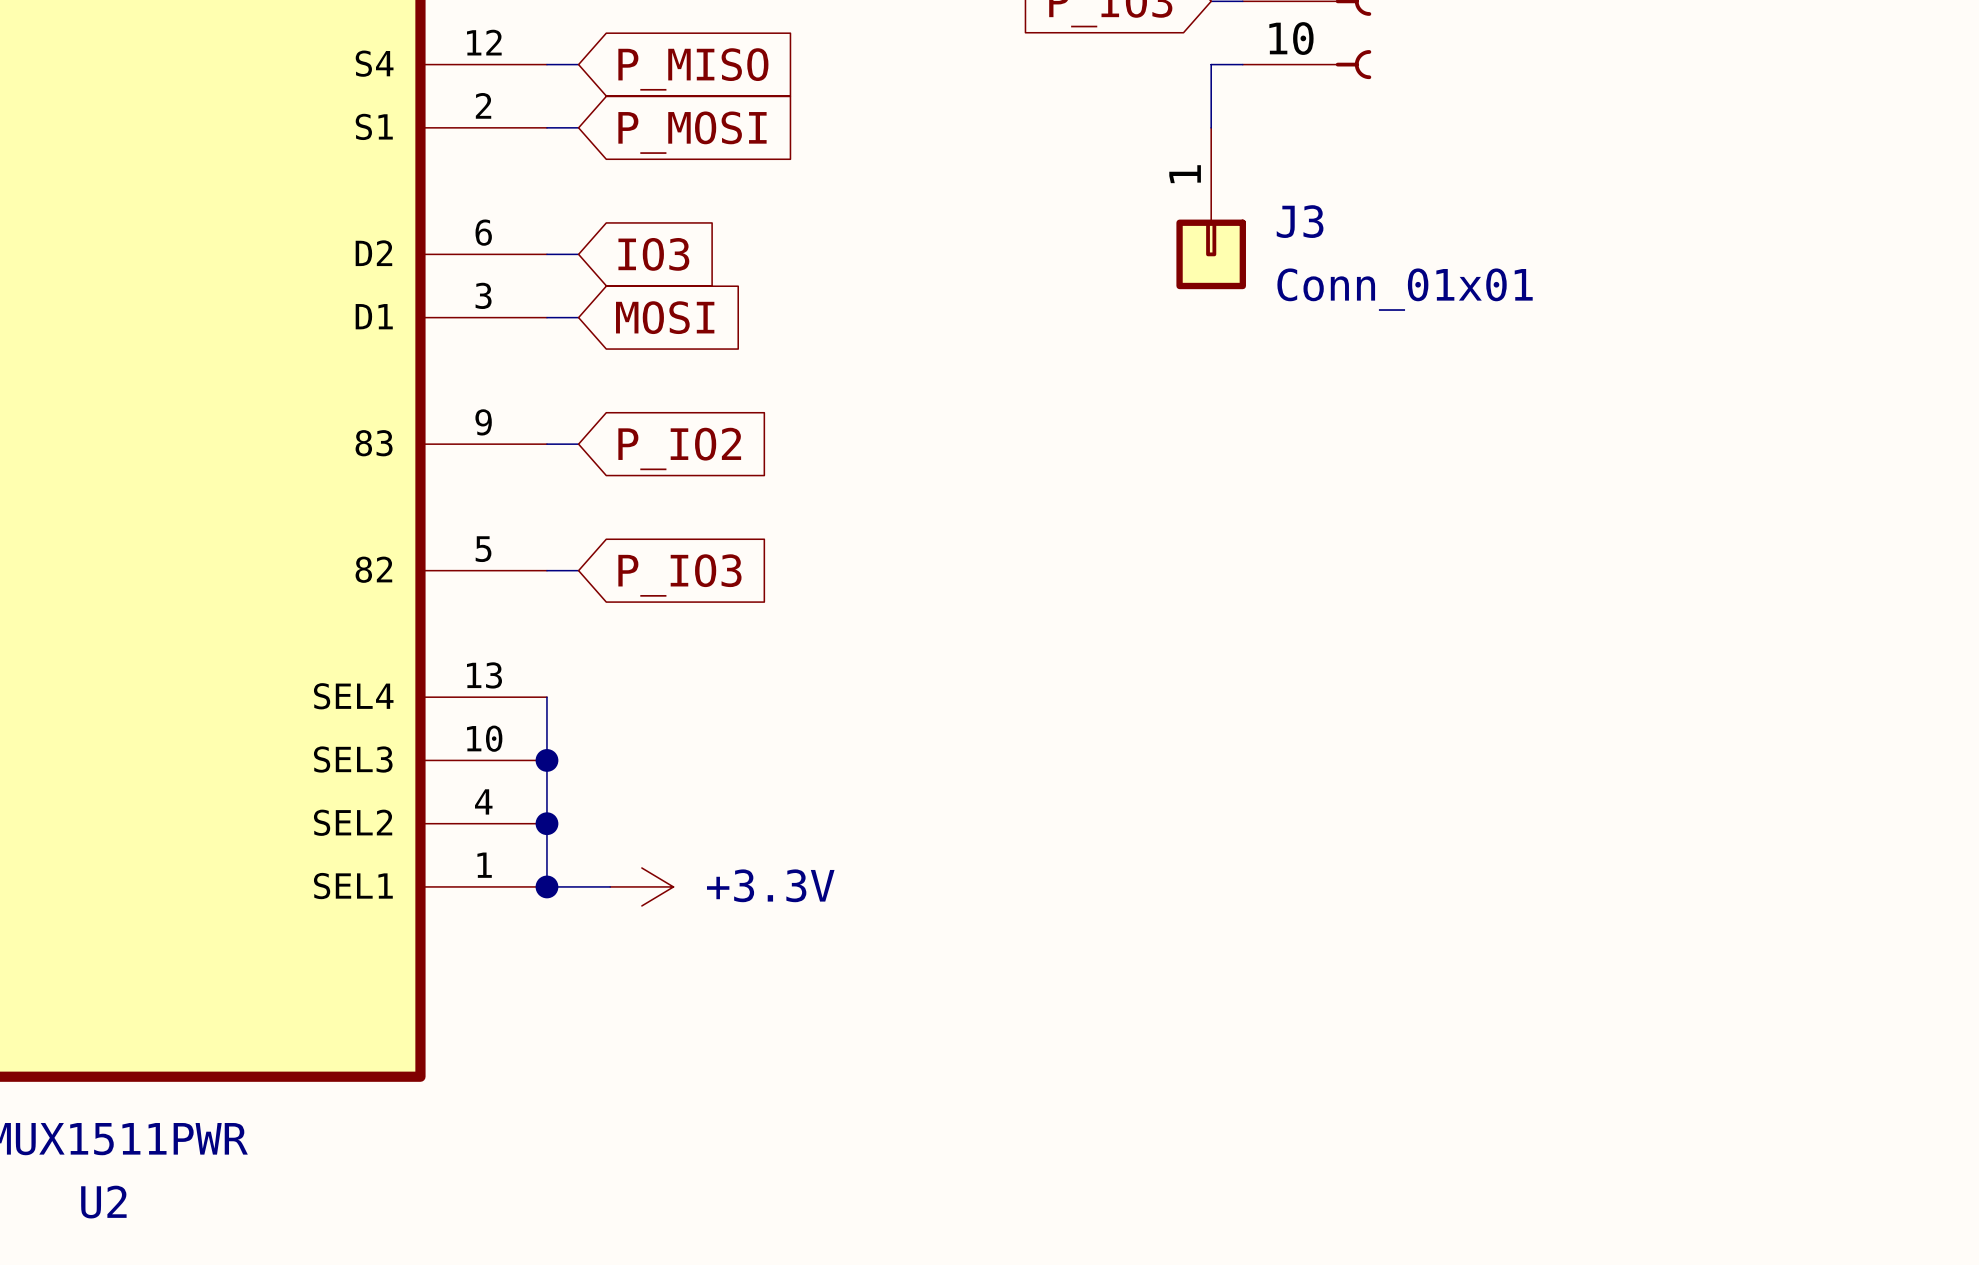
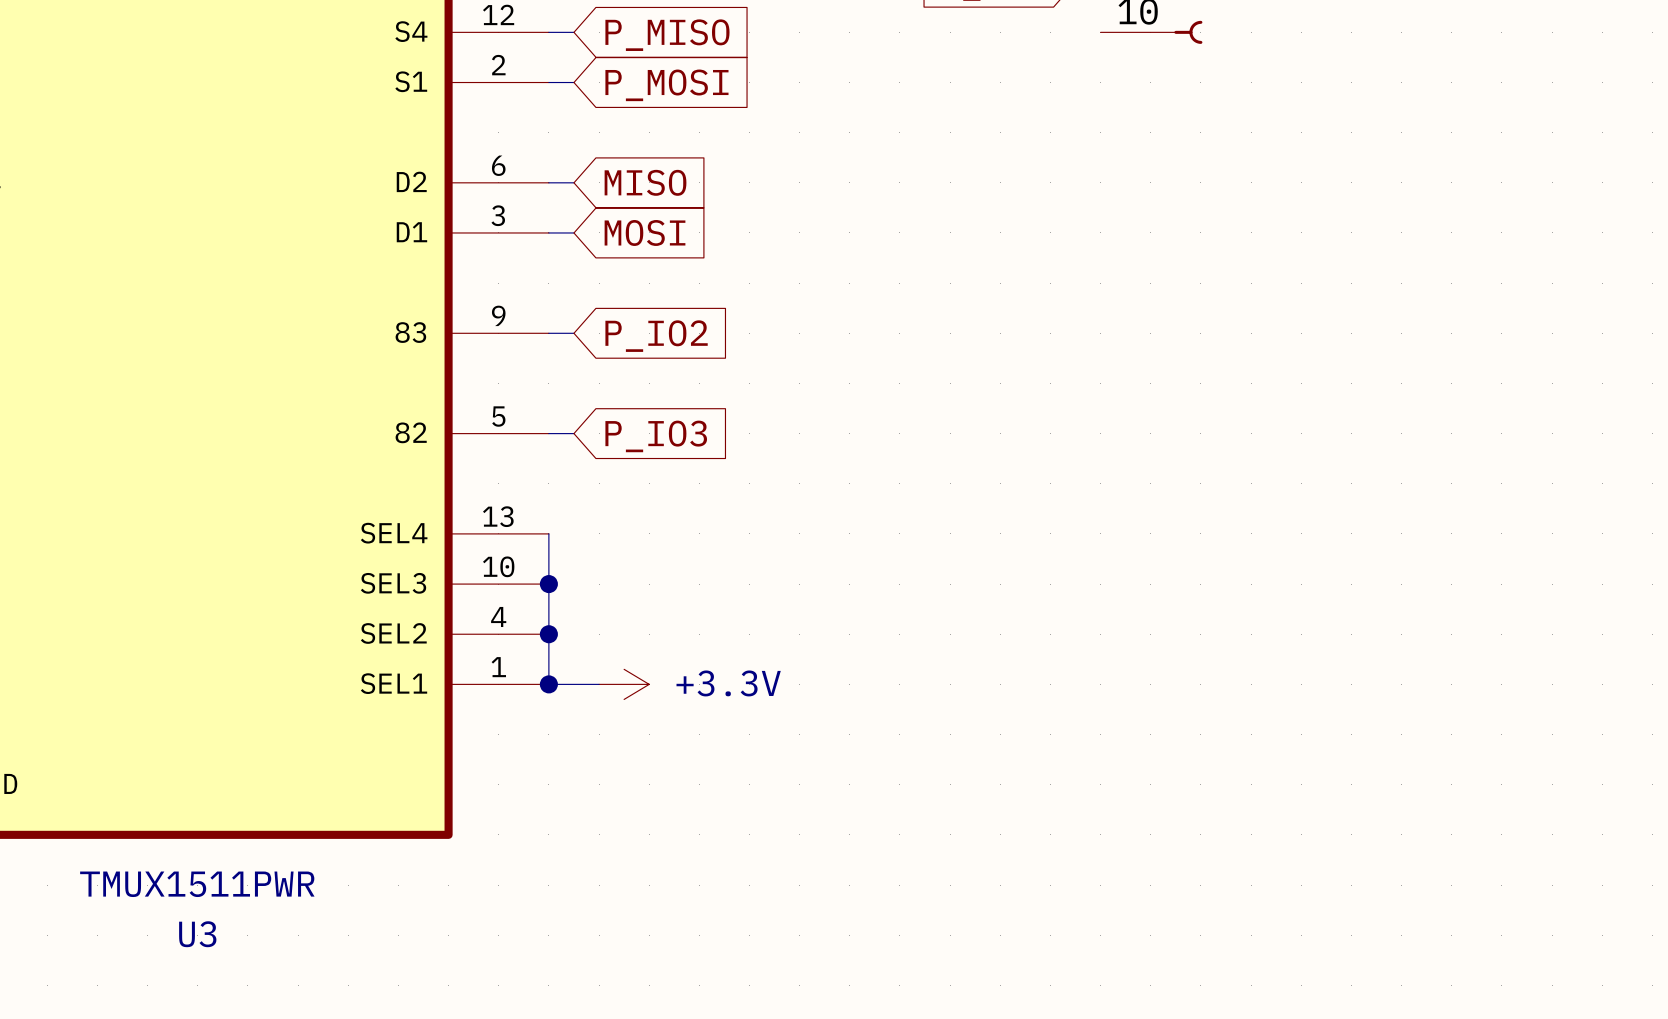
wire: (1242, 64) (1211, 64) (1211, 127) -> none
J3: Conn_01x01 (1211, 208) -> none
global label: IO3 (653, 254) -> MISO (645, 182)
U2 name: U2 (103, 1202) -> U3 (197, 934)

